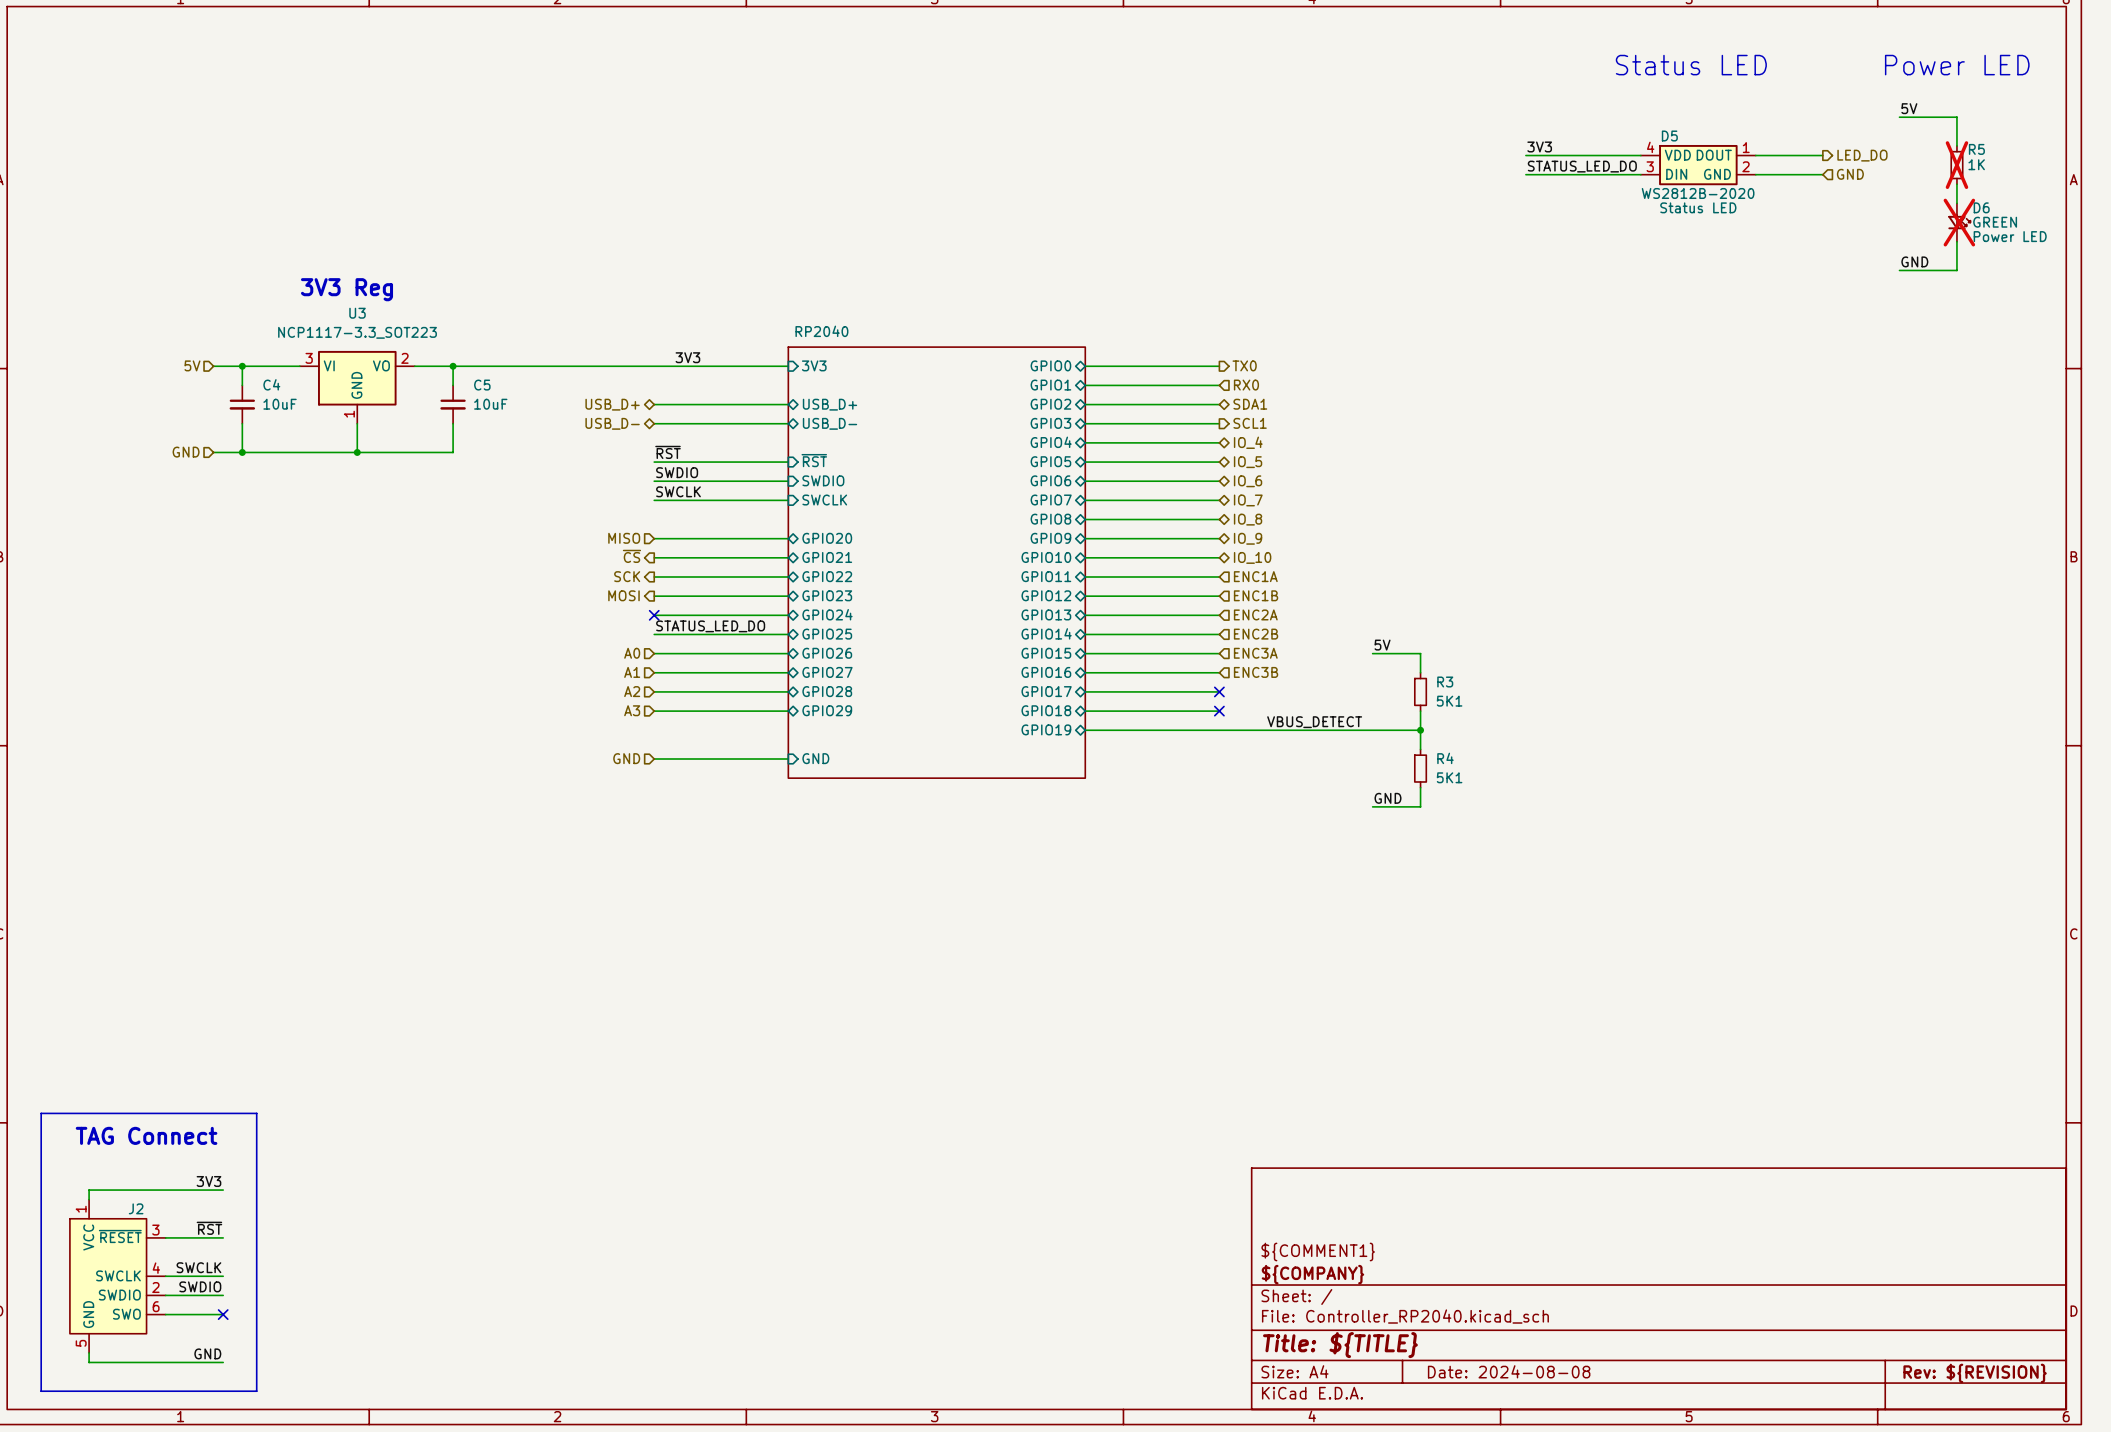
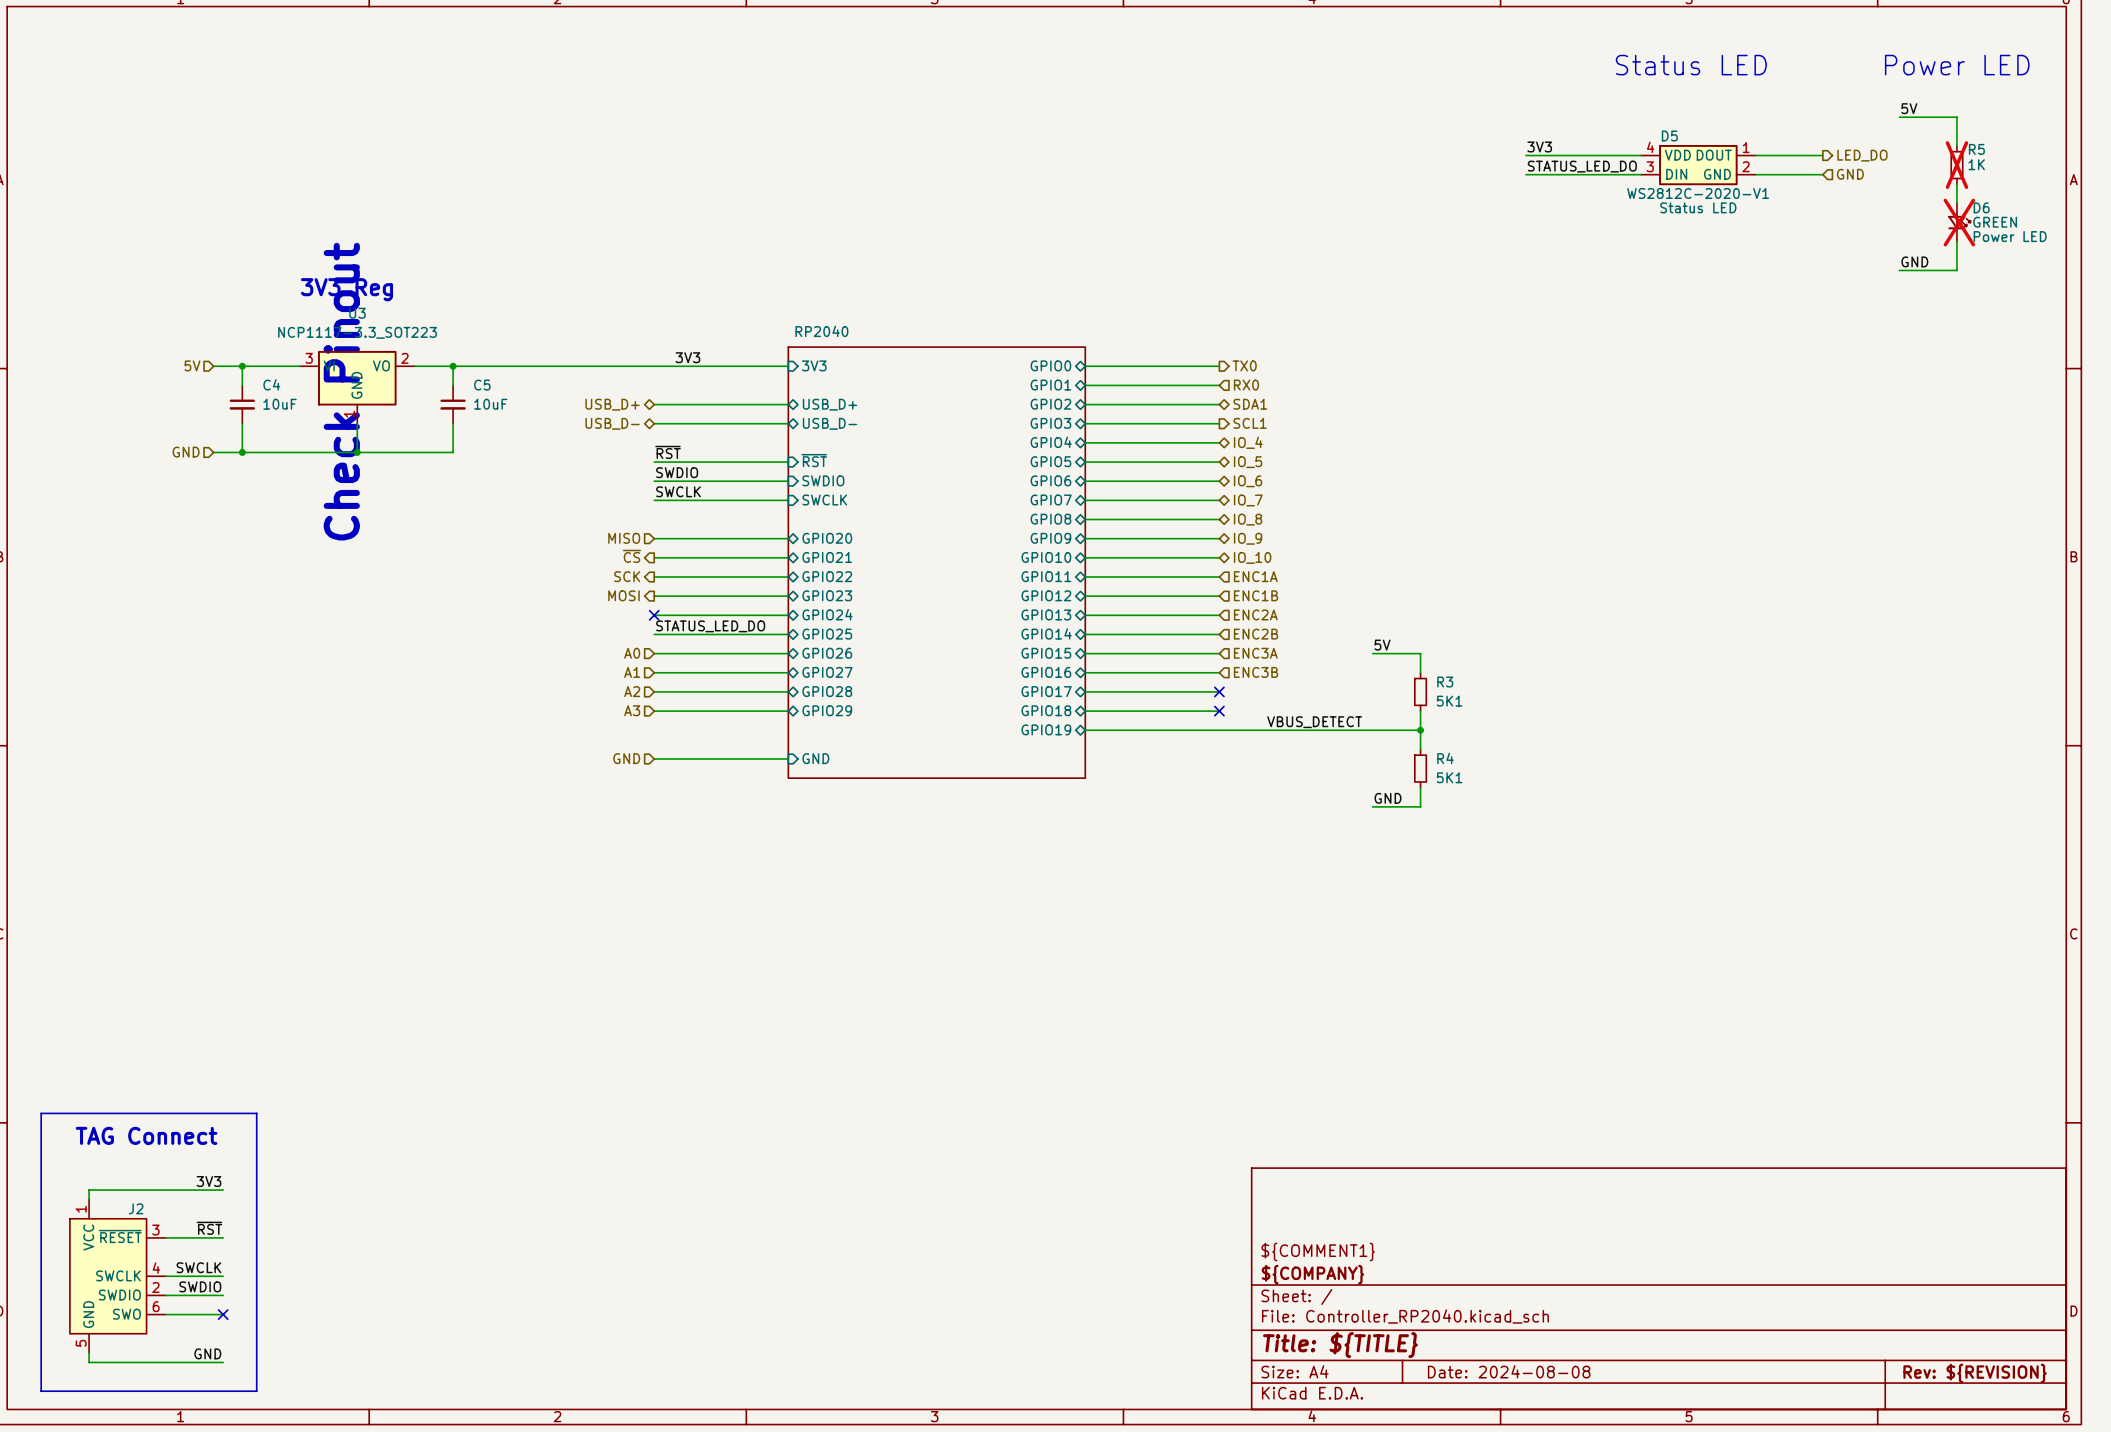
D5 value: WS2812B-2020 (1698, 193) -> WS2812C-2020-V1 (1698, 193)
text: none -> Check Pinout (341, 391)

